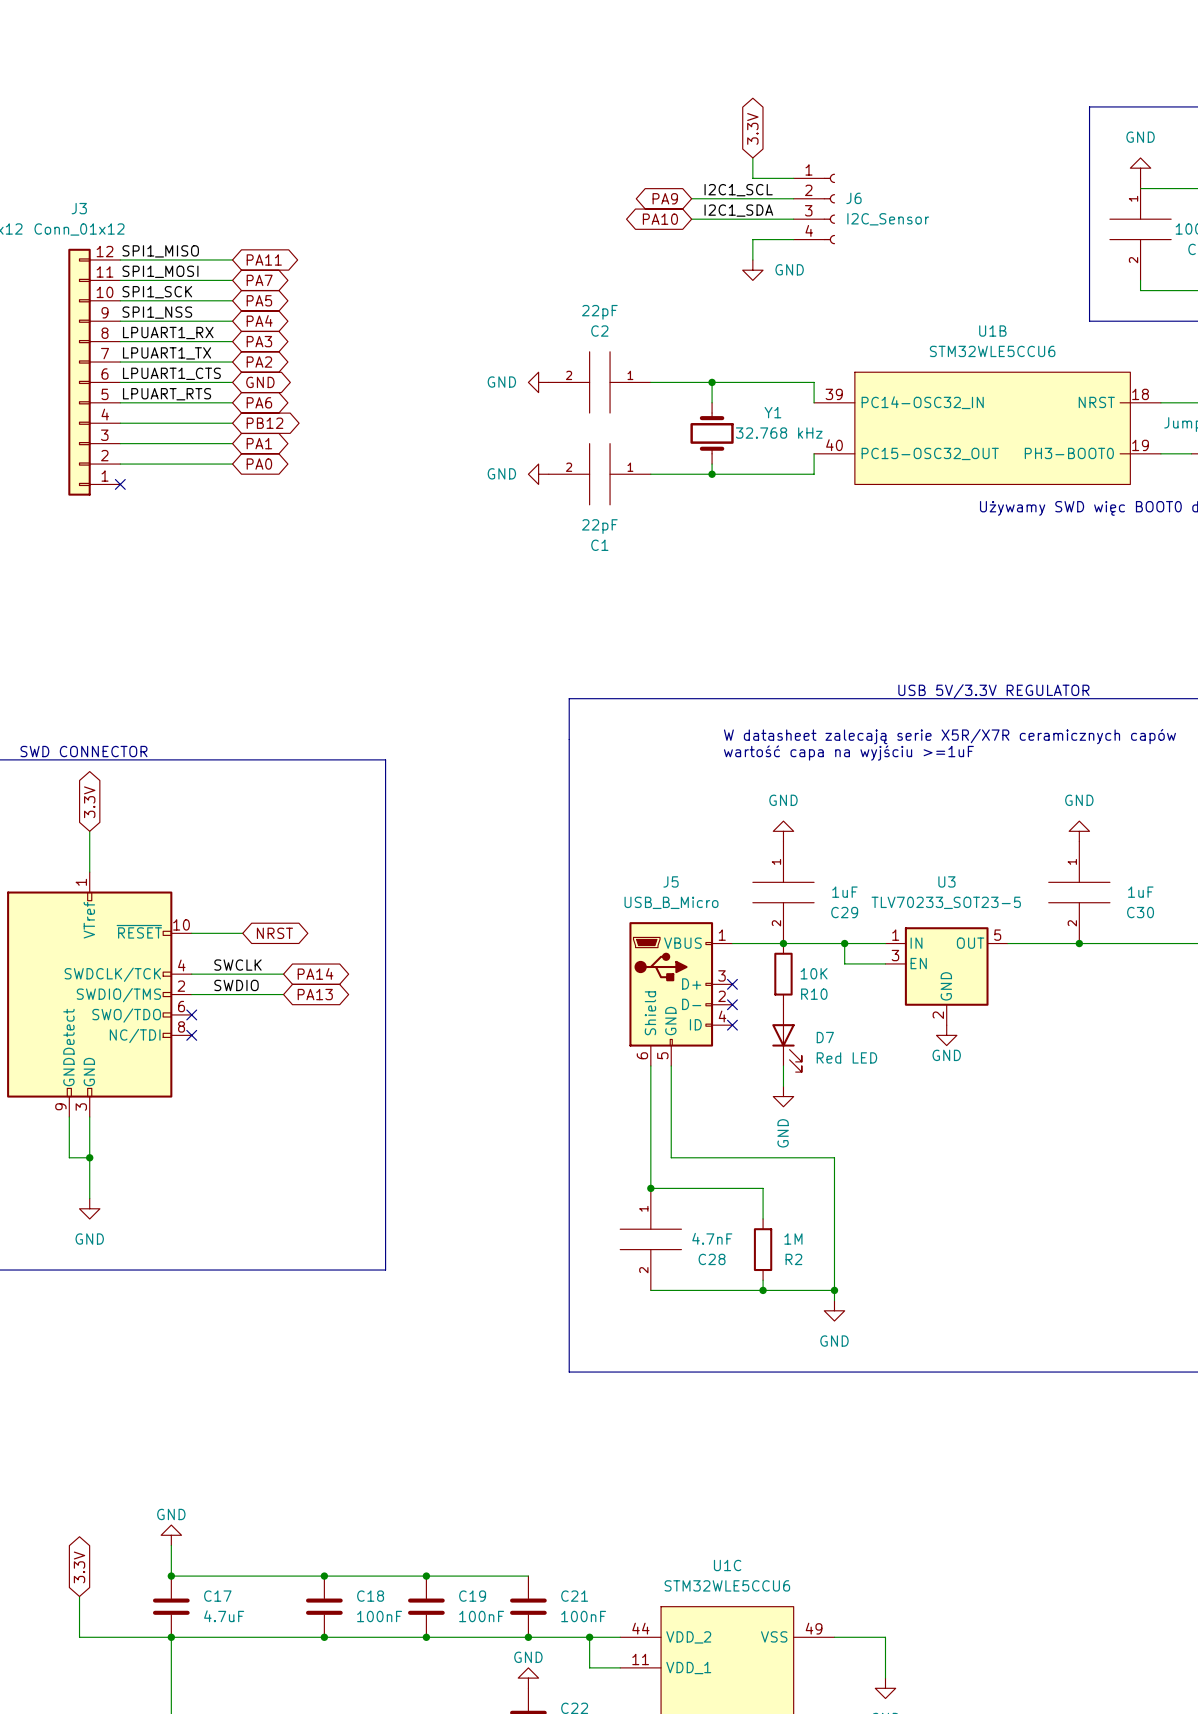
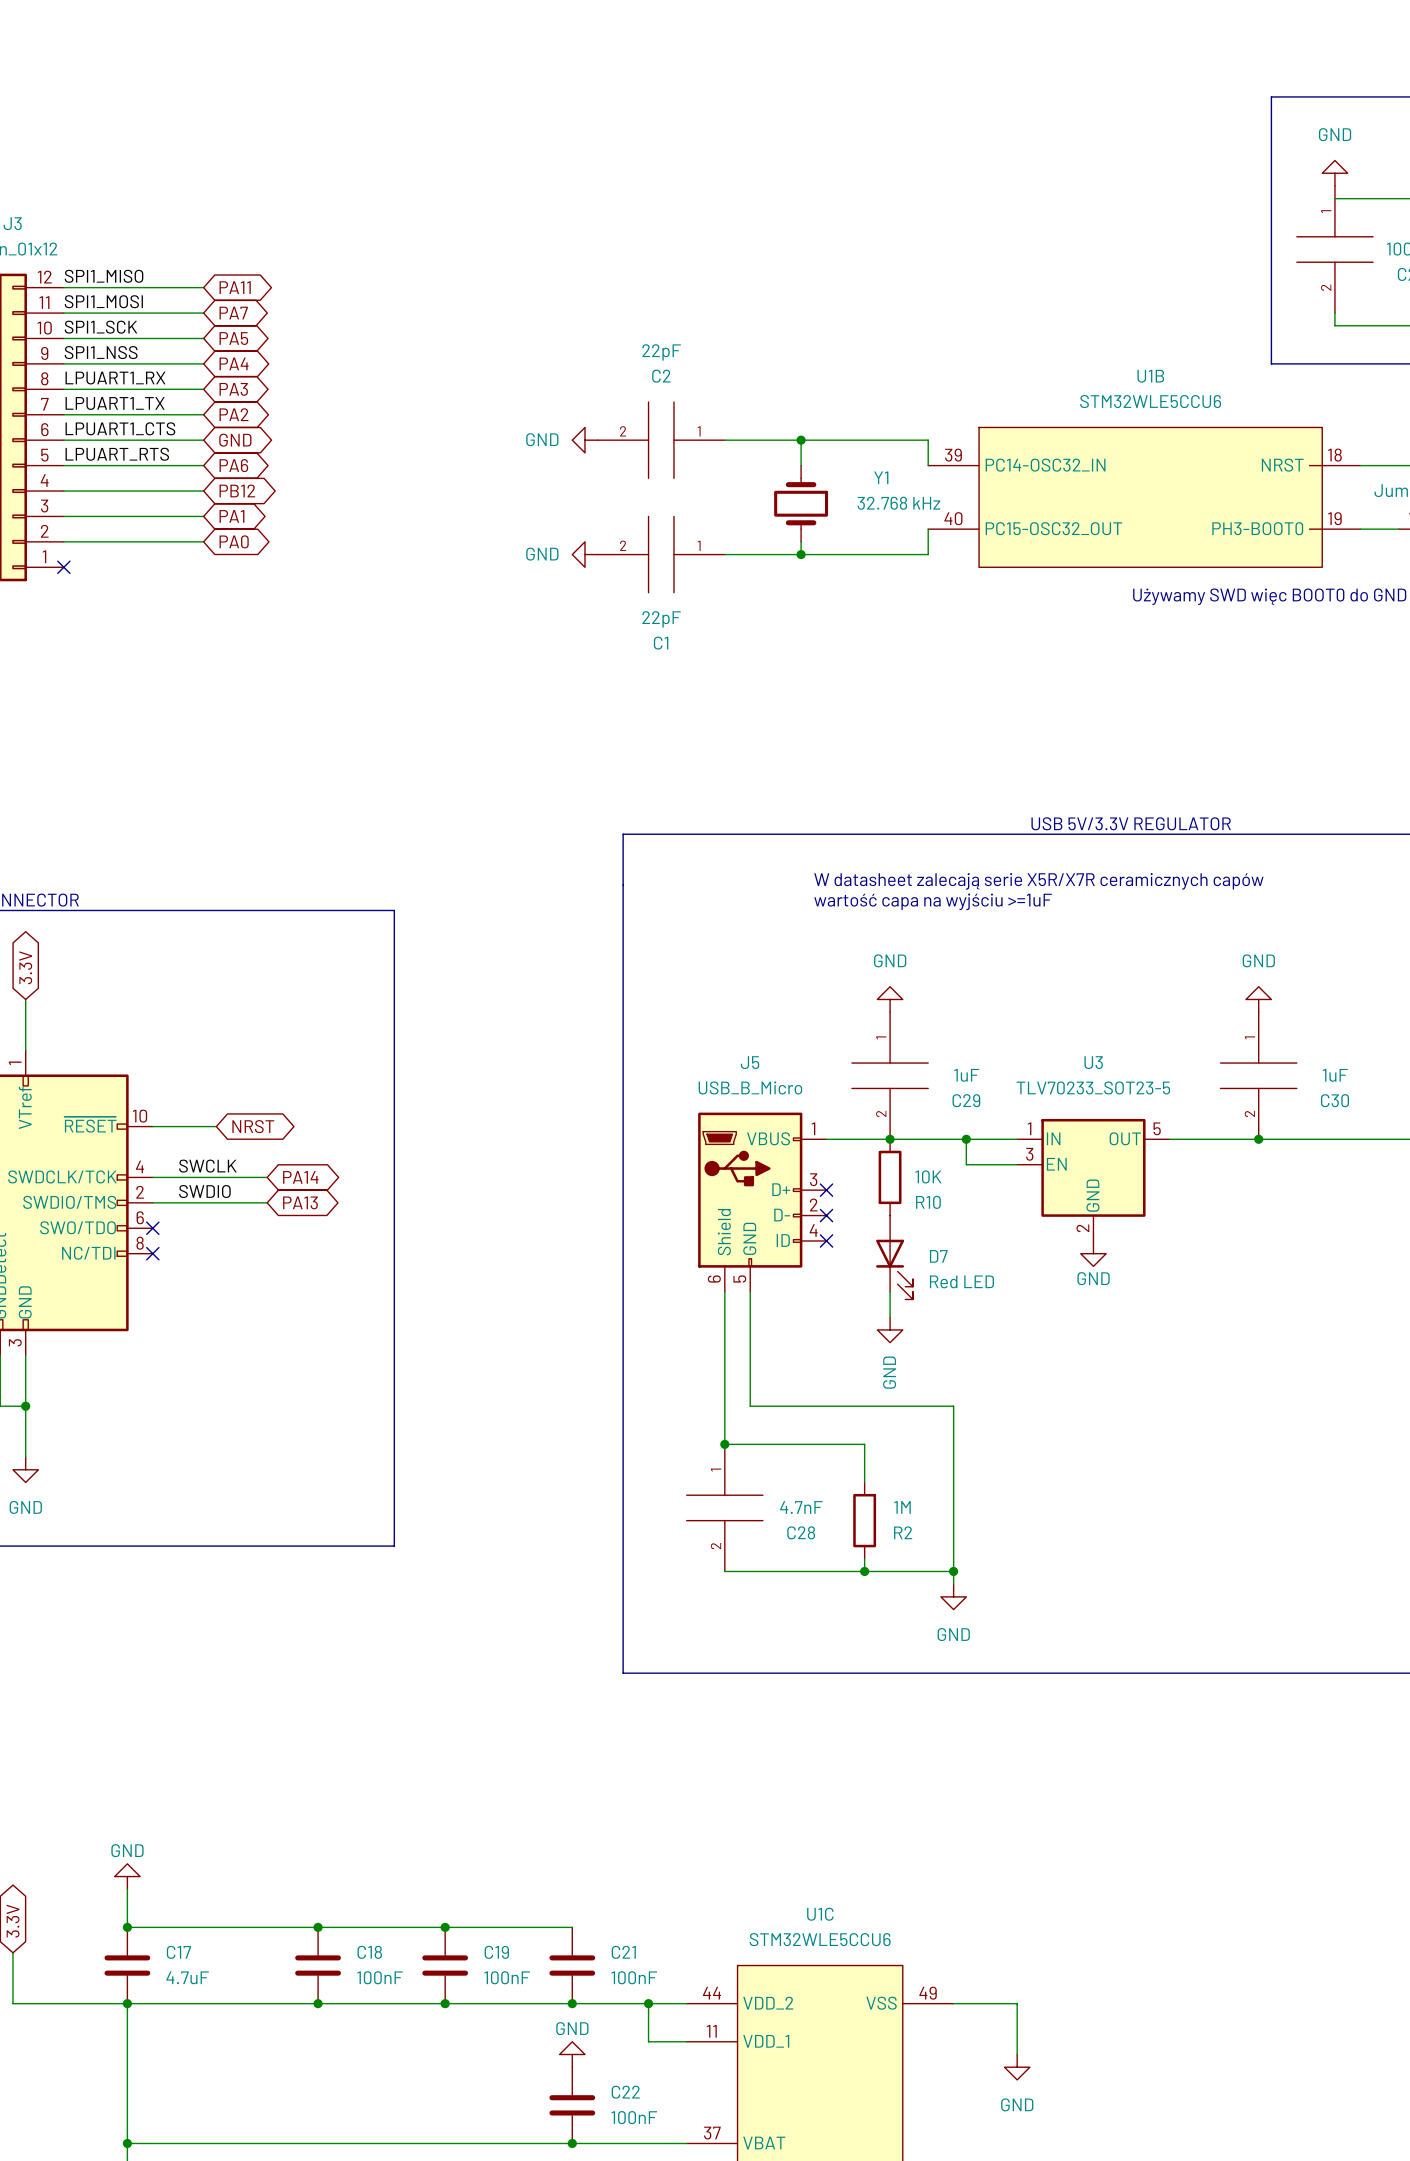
global label: 3.3V (752, 128) -> none
wire: (752, 157) (752, 178) (793, 178) -> none
label: I2C1_SCL (738, 190) -> none
global label: PA9 (665, 198) -> none
wire: (691, 198) (793, 198) -> none
J6: I2C_Sensor (814, 208) -> none
label: I2C1_SDA (738, 210) -> none
global label: PA10 (660, 219) -> none
wire: (691, 219) (793, 219) -> none
wire: (793, 239) (752, 239) (752, 259) -> none
power symbol: GND (752, 270) -> none

